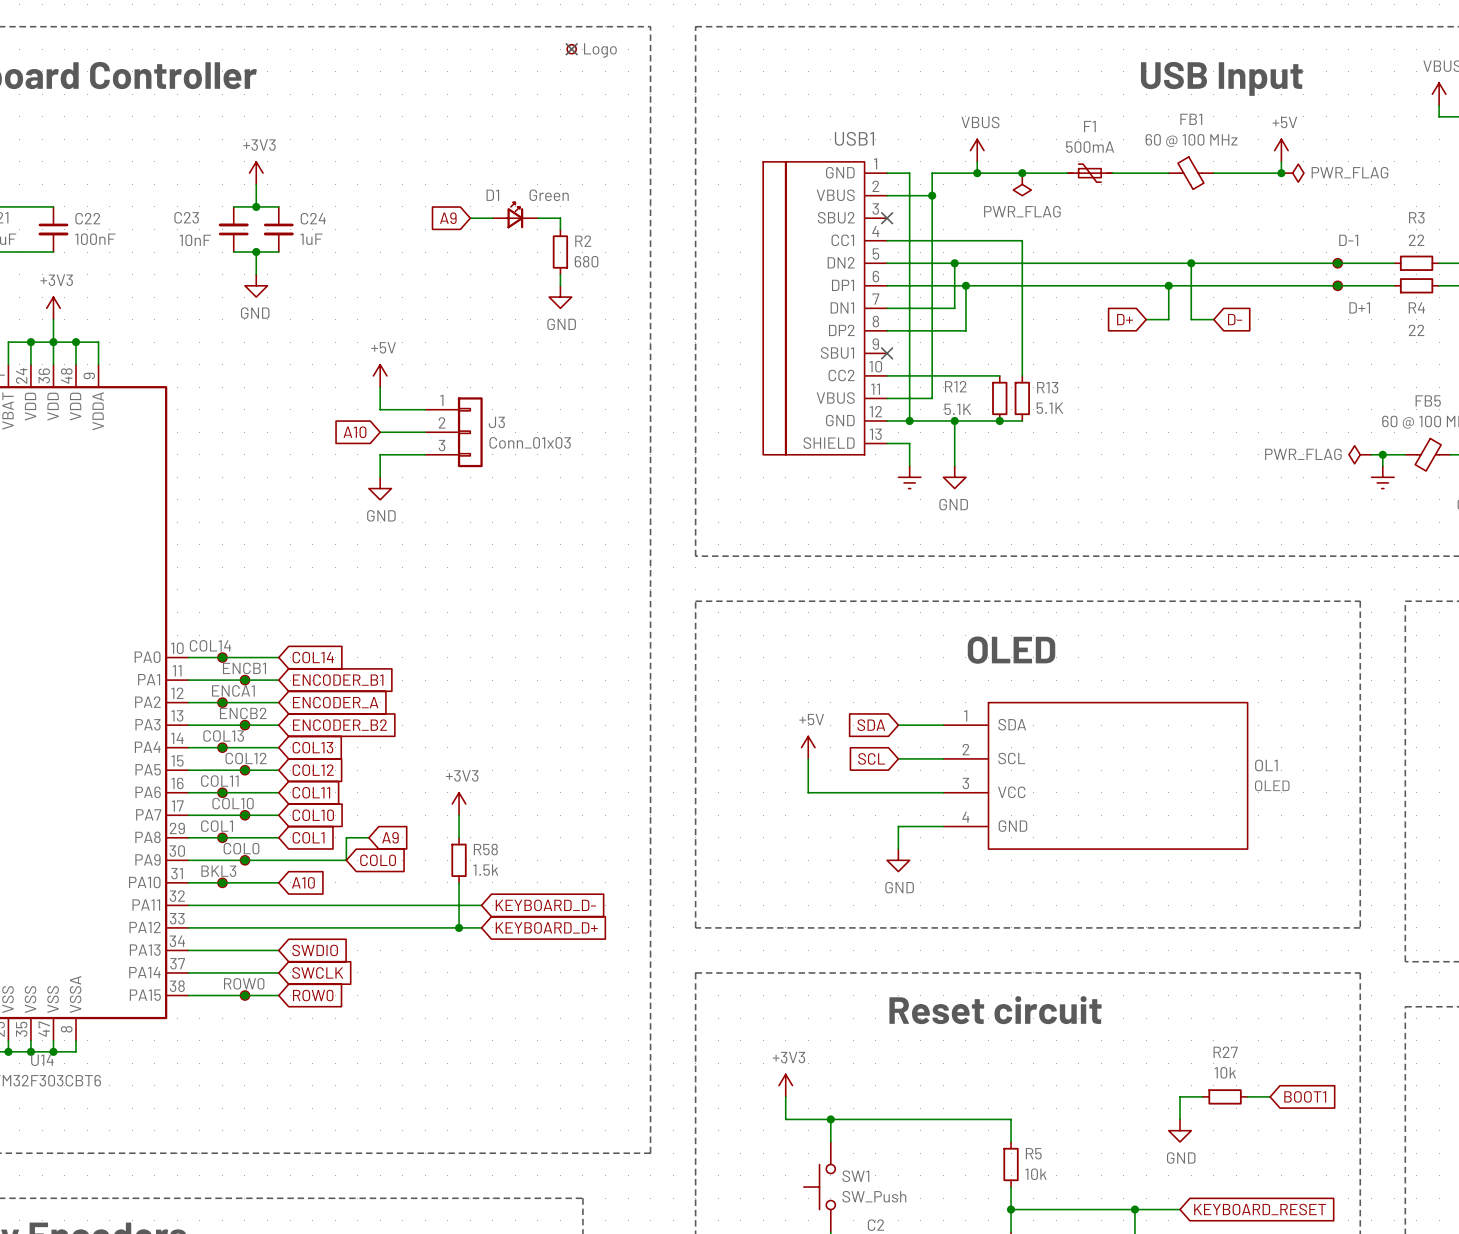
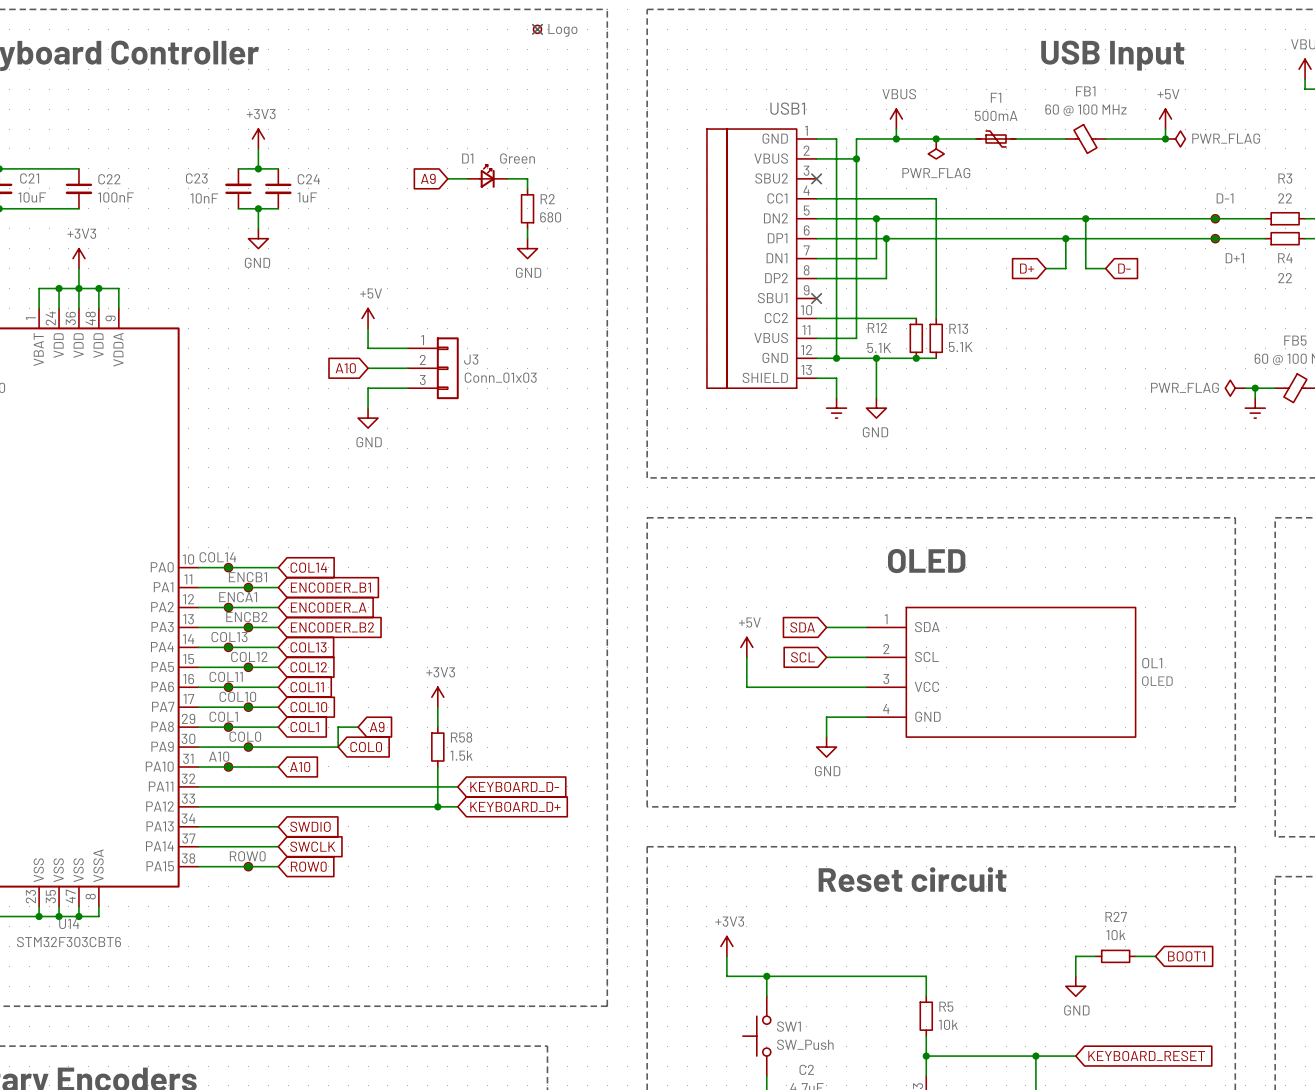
BKL3 name: BKL3 (218, 871) -> A10 (219, 756)

